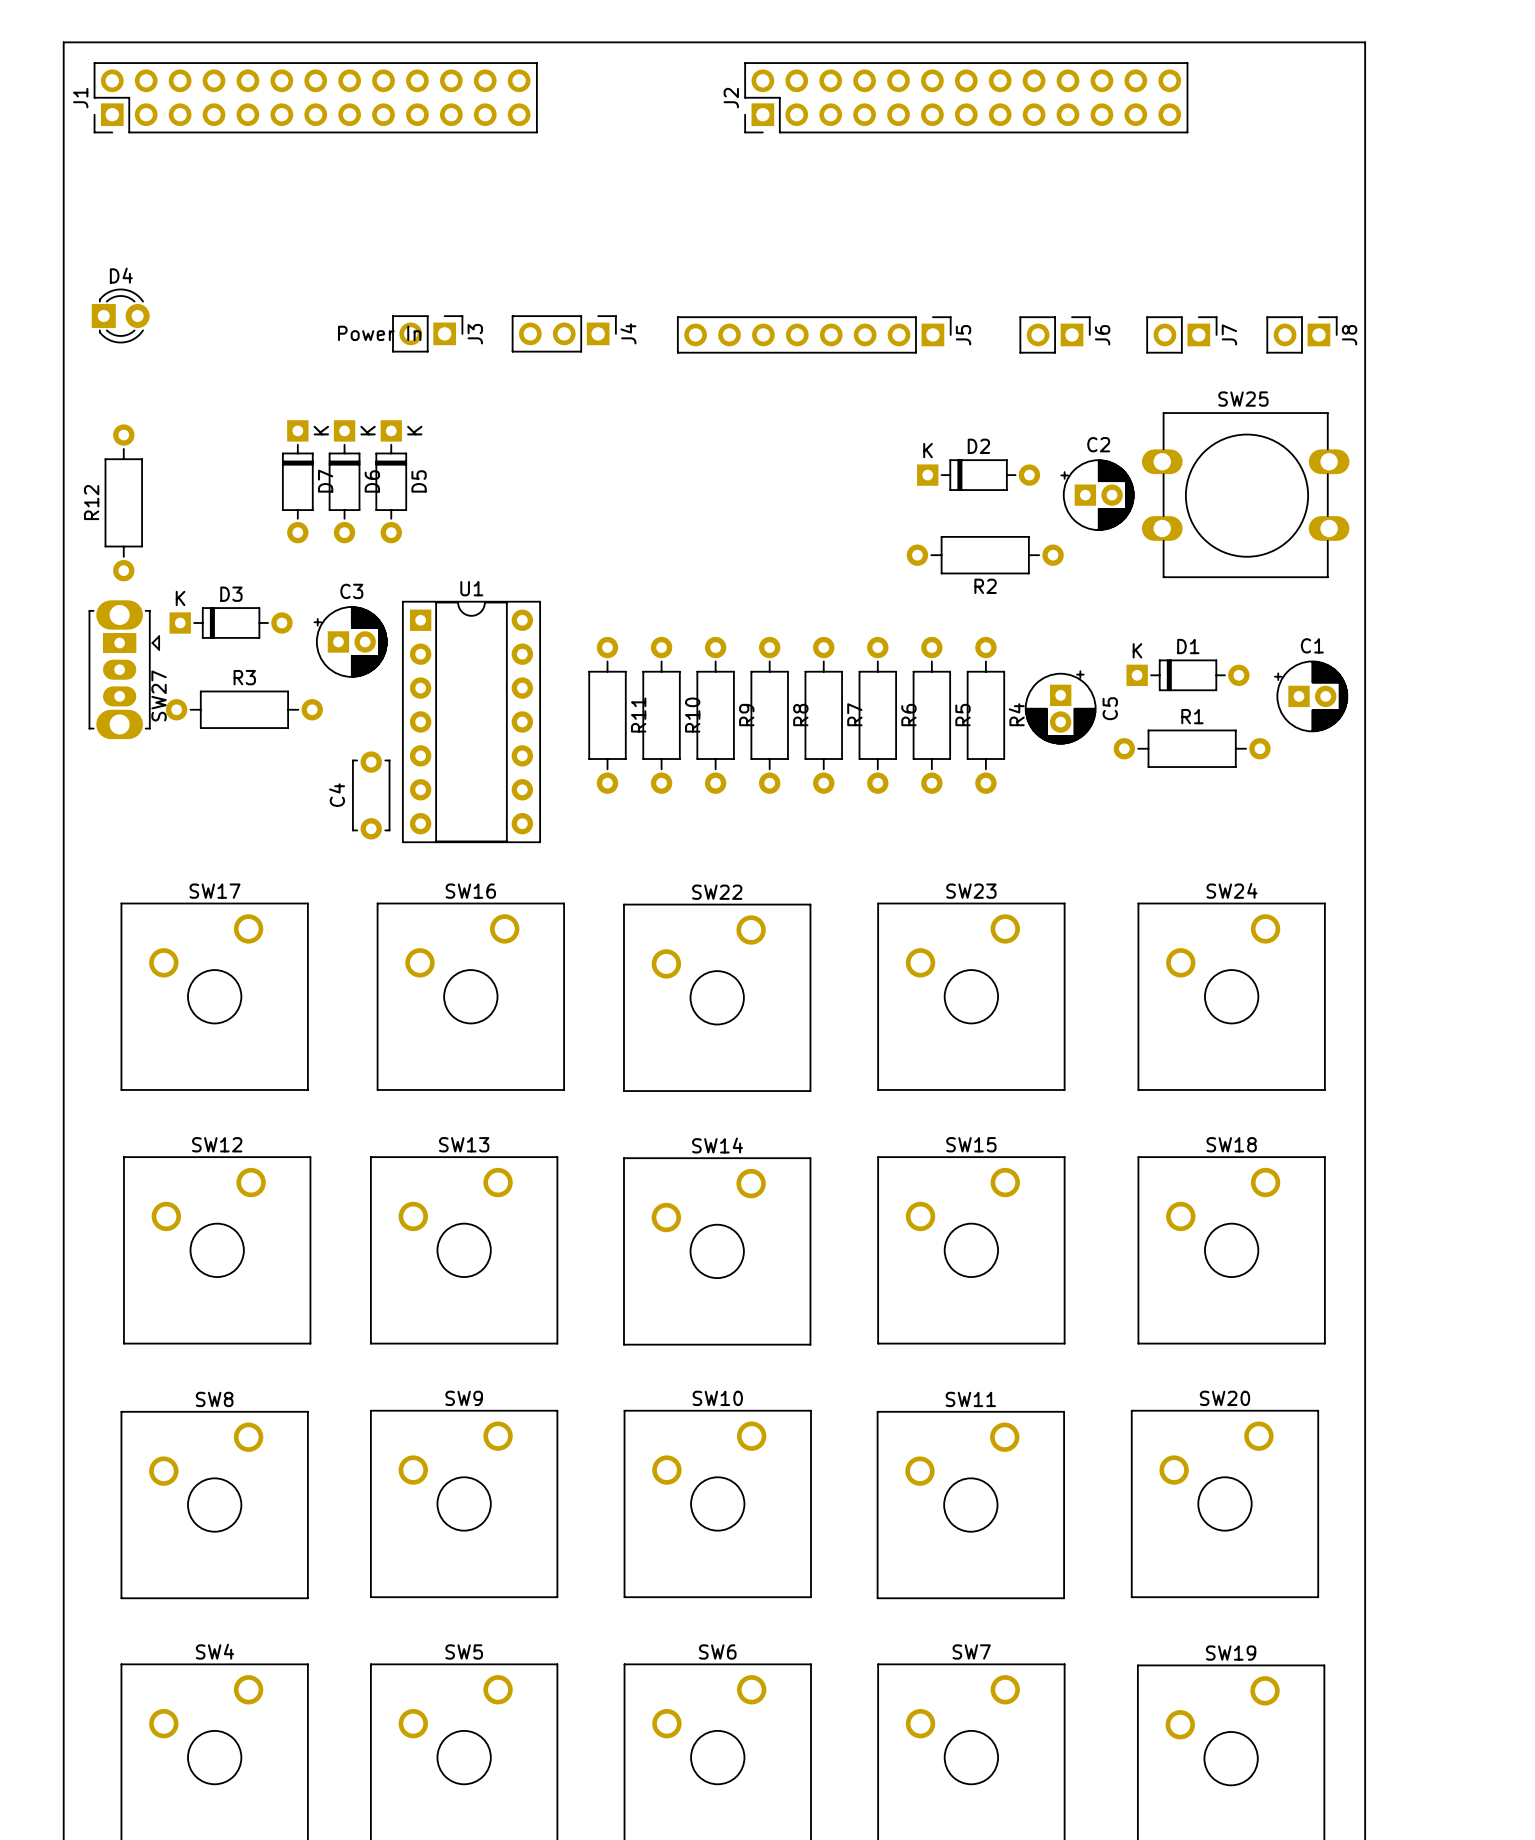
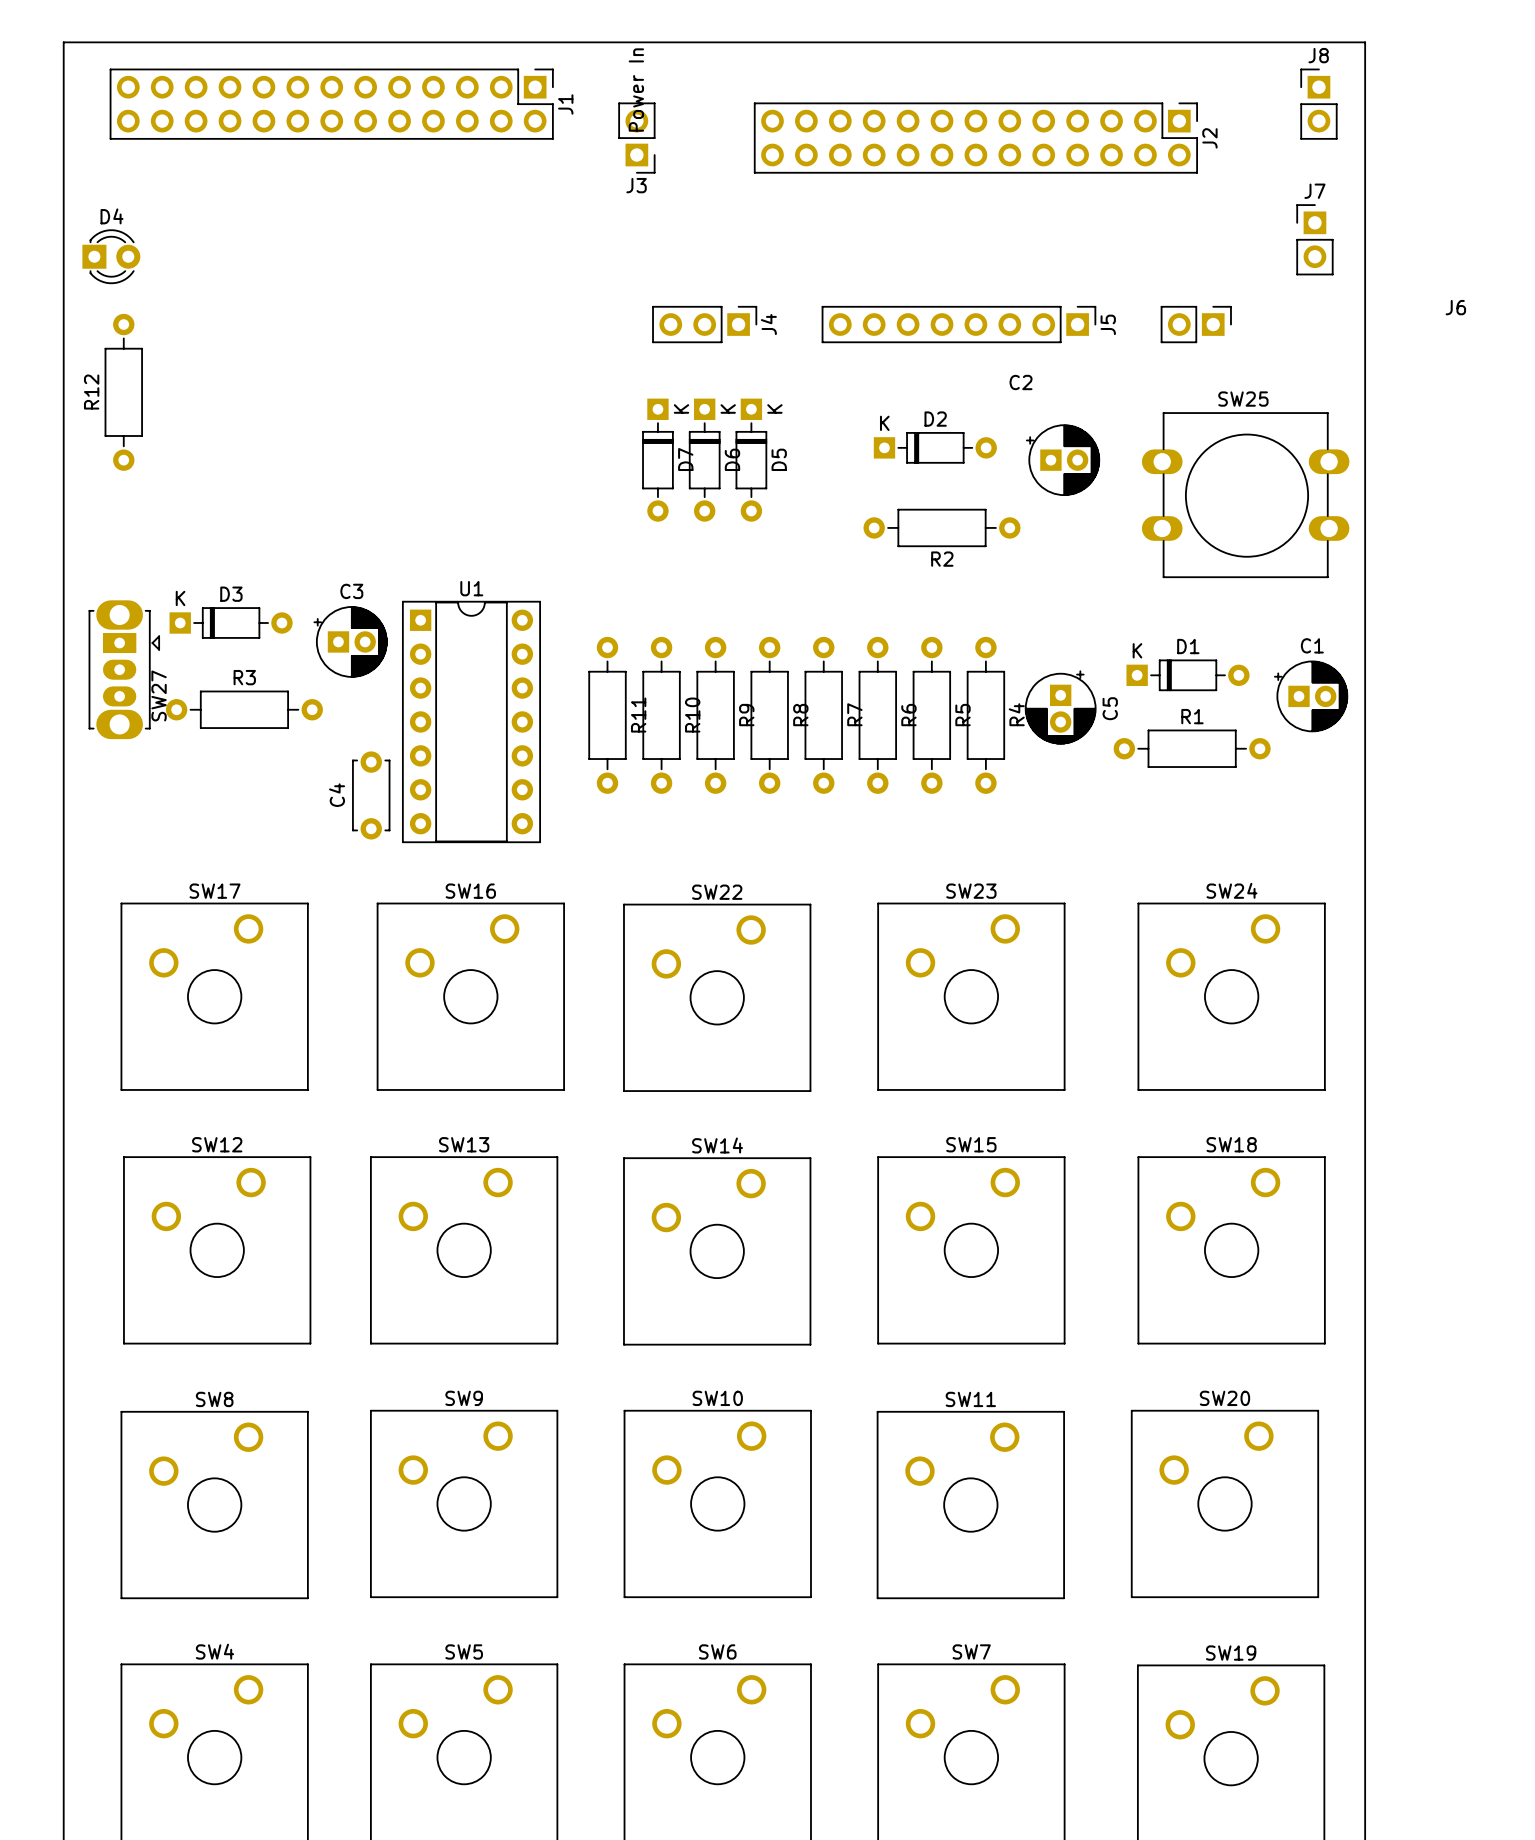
J1 rotation: 0° (315, 97) -> 180° (331, 104)
J2 rotation: 0° (966, 97) -> 180° (975, 138)
D4 position: (120, 315) -> (111, 256)
J3 rotation: 0° (427, 333) -> 90° clockwise (636, 138)
J3 position: (427, 333) -> (636, 138)
J4 position: (564, 333) -> (704, 324)
J5 position: (814, 334) -> (958, 324)
J6 position: (1055, 334) -> (1196, 324)
J7 rotation: 0° (1181, 334) -> 90° counterclockwise (1314, 239)
J7 position: (1181, 334) -> (1314, 239)
J8 rotation: 0° (1302, 334) -> 90° counterclockwise (1318, 104)
J8 position: (1302, 334) -> (1318, 104)
J6 name rotation: 0° (1102, 335) -> 90° clockwise (1455, 307)
J6 name position: J6 (1102, 335) -> J6 (1455, 307)
C2 name position: C2 (1098, 444) -> C2 (1021, 382)
D2 position: (978, 475) -> (935, 447)
D7 position: (297, 481) -> (657, 460)
D6 position: (344, 481) -> (704, 460)
D5 position: (391, 481) -> (751, 460)
C2 position: (1097, 495) -> (1063, 460)
R12 position: (123, 502) -> (123, 392)
R2 position: (985, 555) -> (942, 527)

